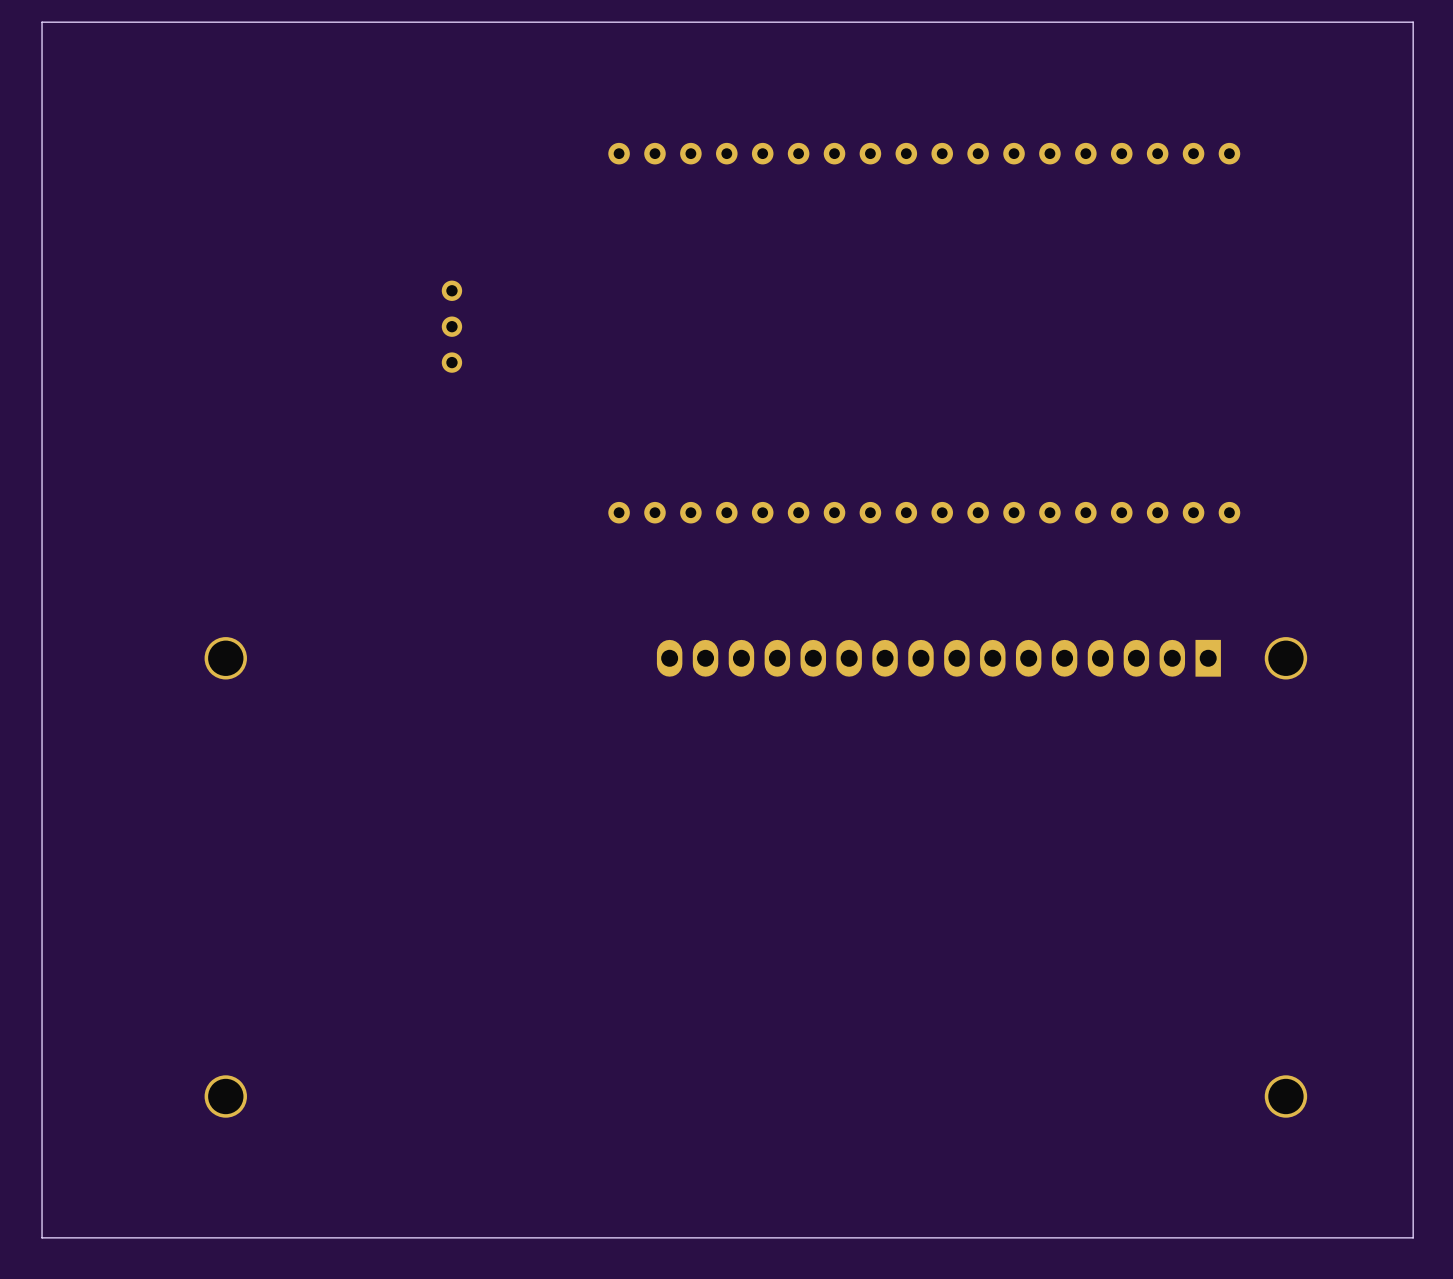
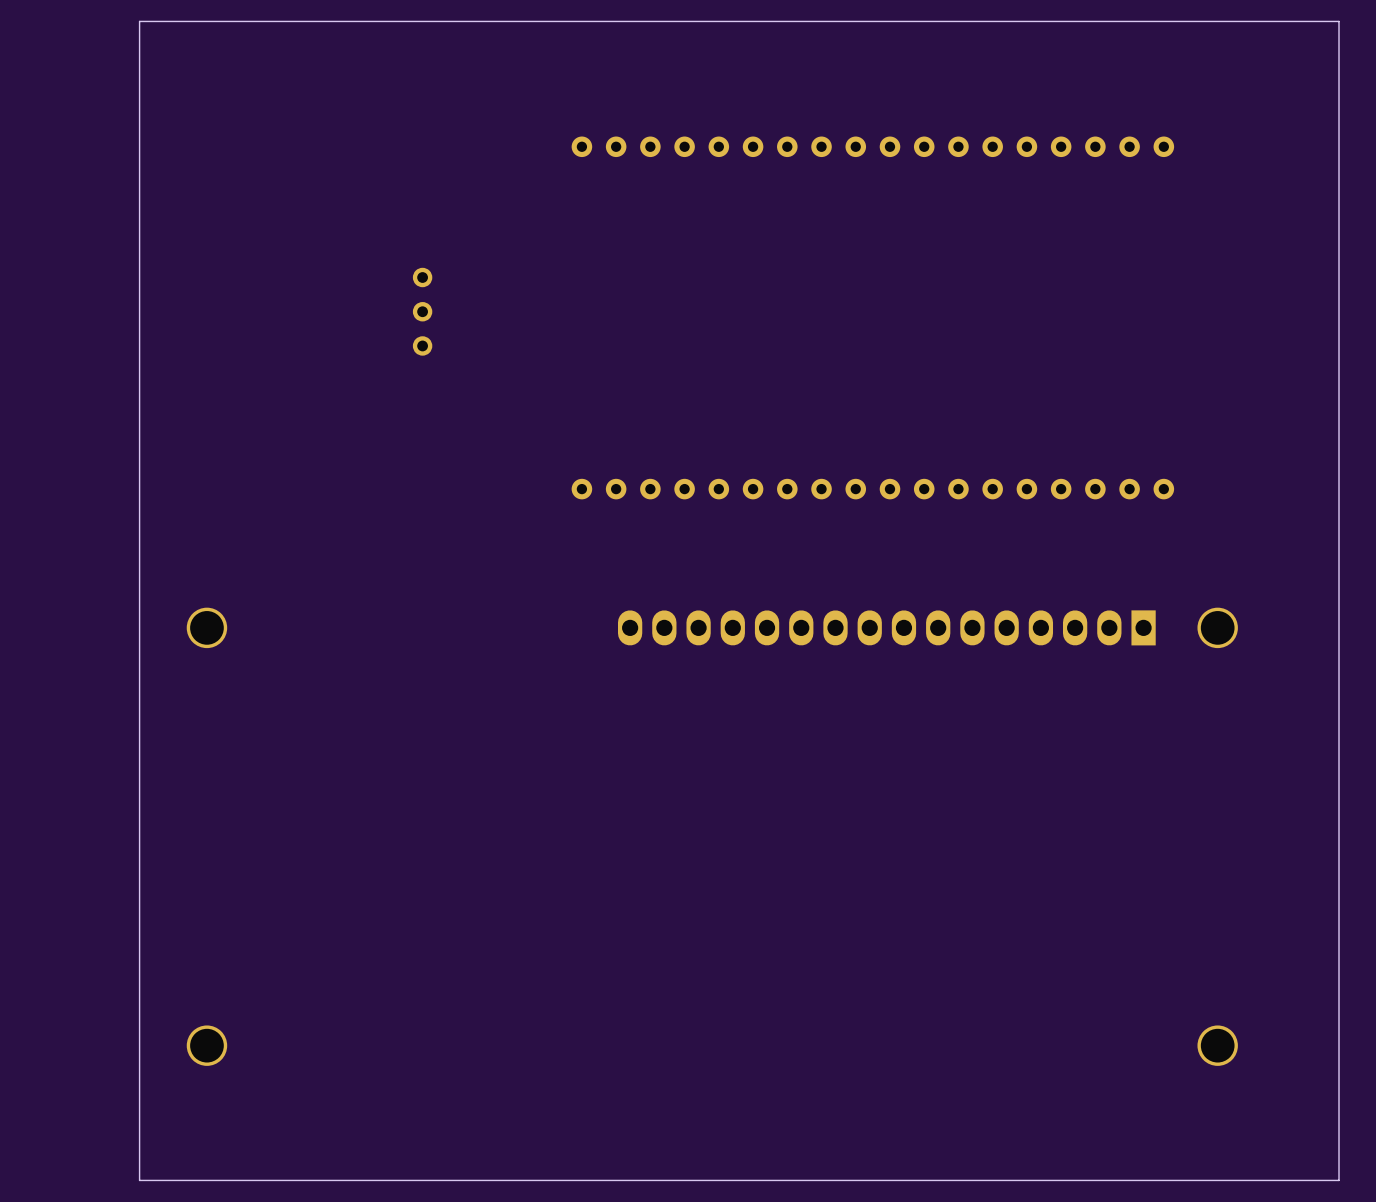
board edge: (155, 22) (42, 22) (42, 1237) (155, 1237) -> (139, 21) (139, 1180)

